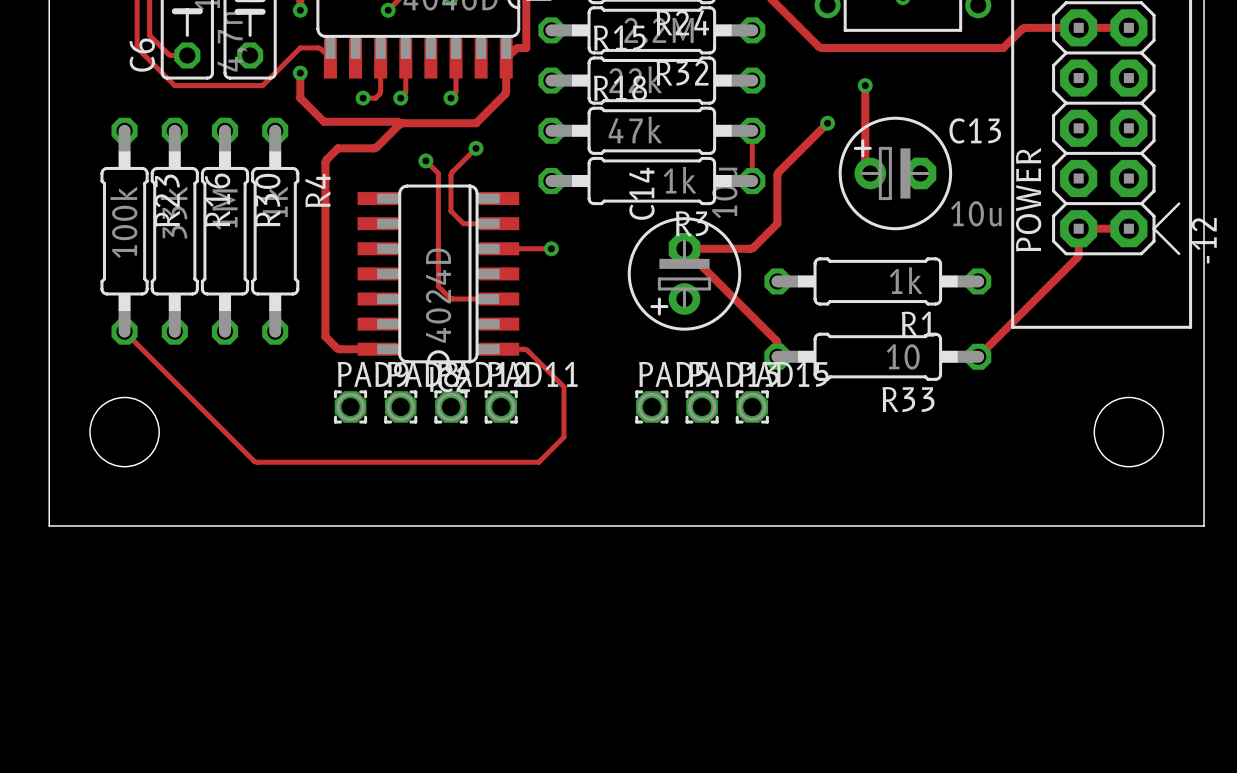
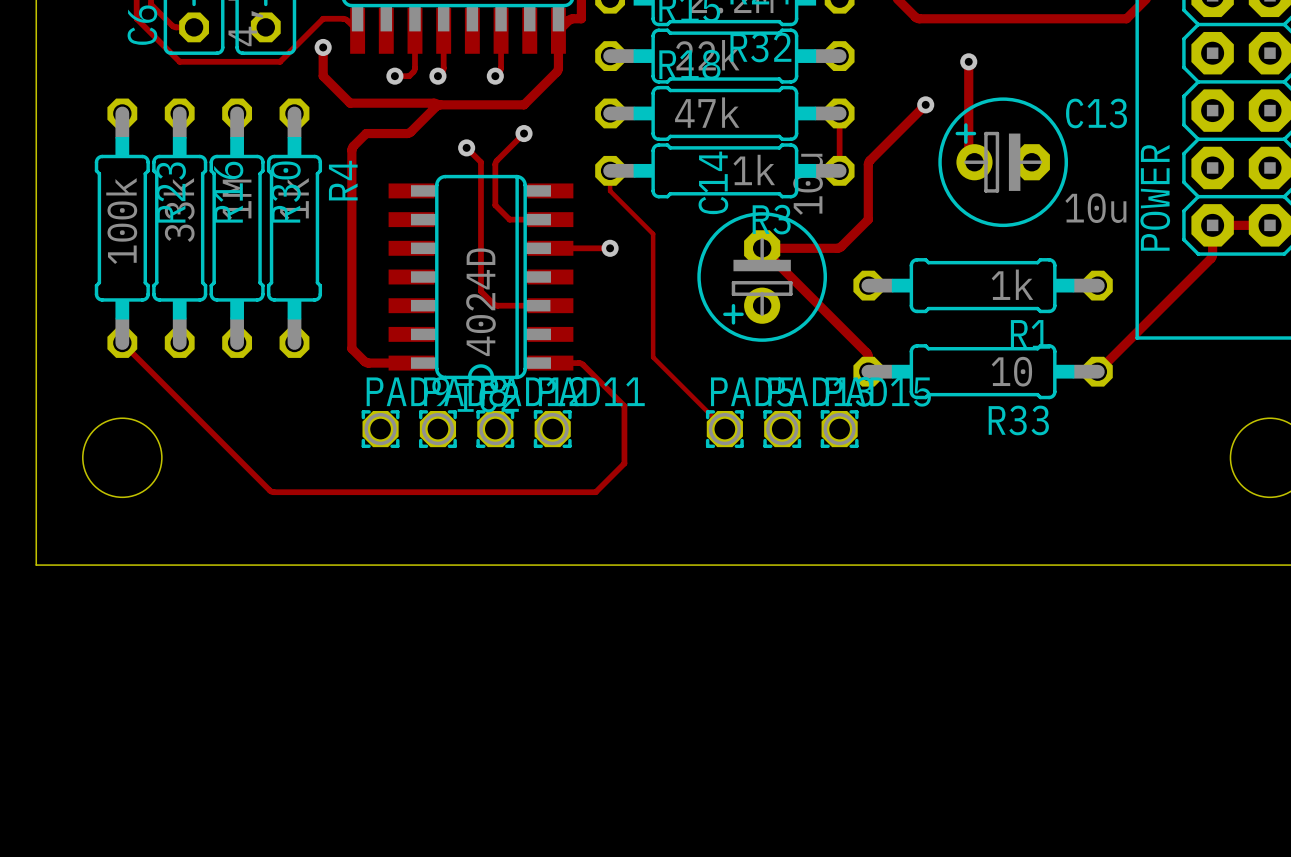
track: none -> (610, 170) (610, 190) (653, 233) (653, 357) (724, 429)

